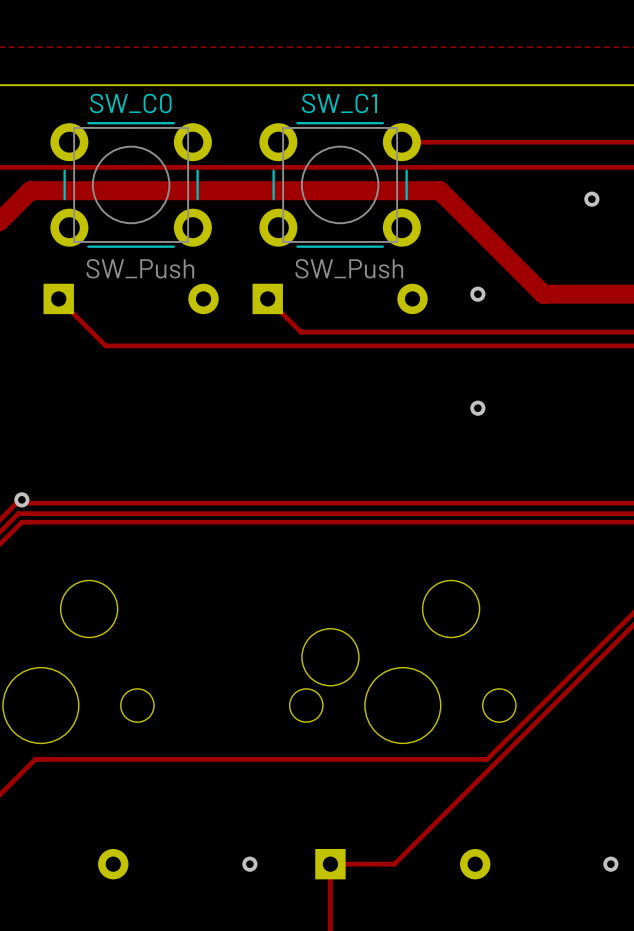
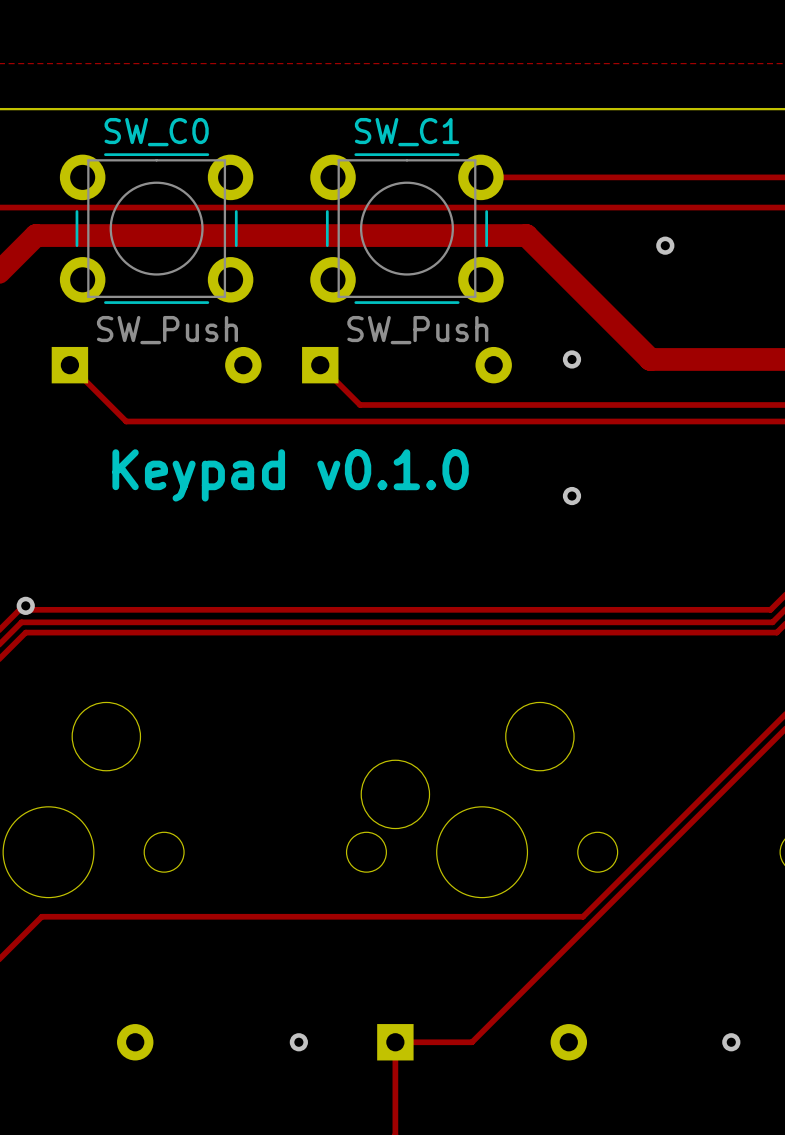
via position: (591, 199) -> (665, 245)
text: none -> Keypad v0.1.0 (290, 475)

